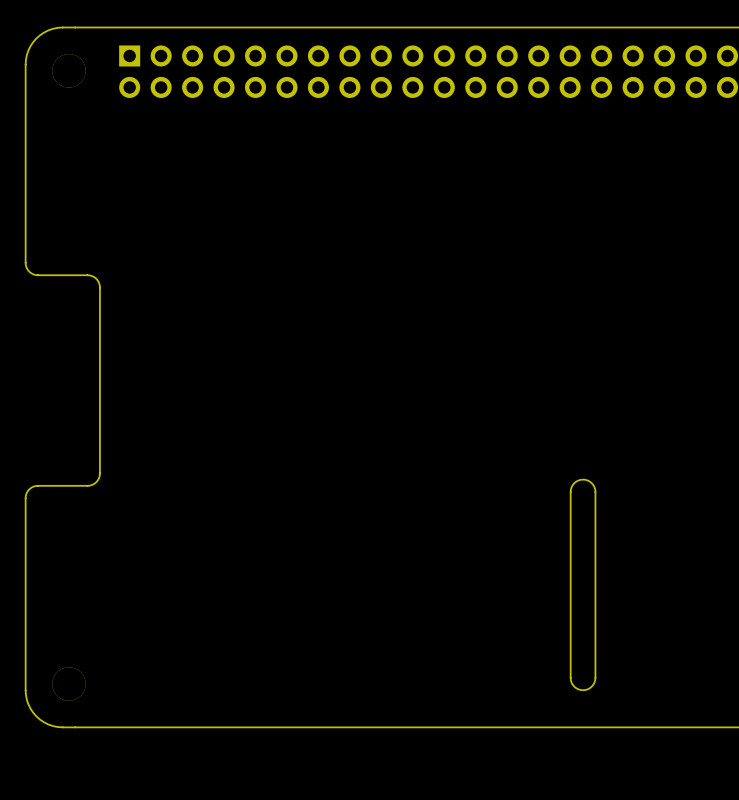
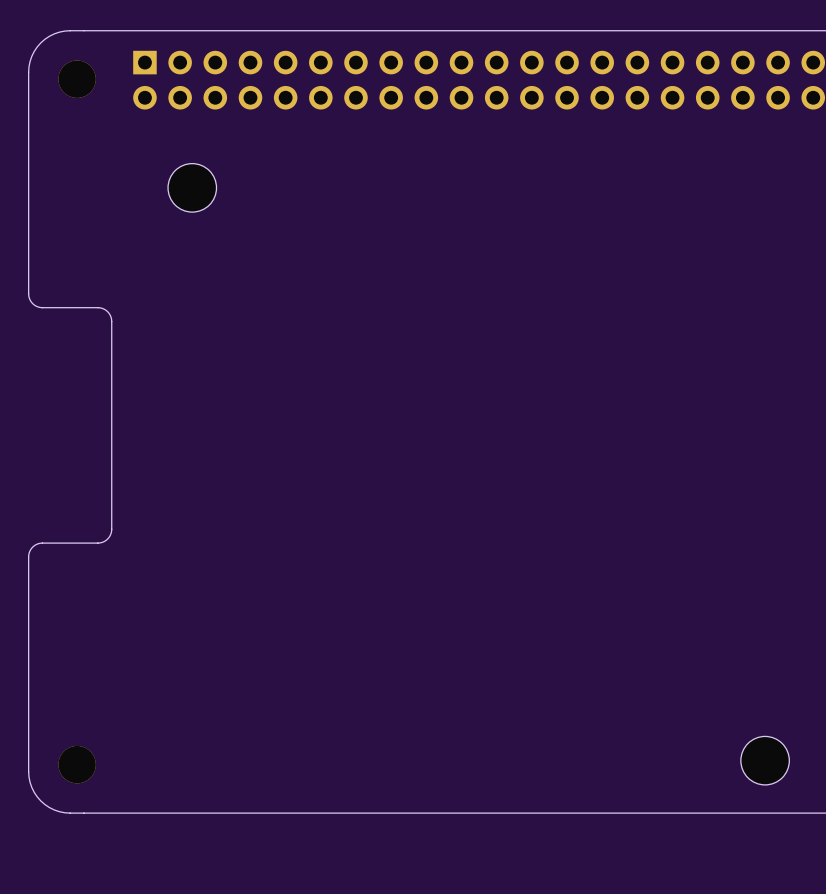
part: none -> (192, 187)
board edge: (570, 492) (570, 679) (575, 687) (584, 690) (591, 686) (595, 677) (595, 490) (591, 483) (583, 479) (574, 483) (570, 492) -> none
part: none -> (765, 760)

